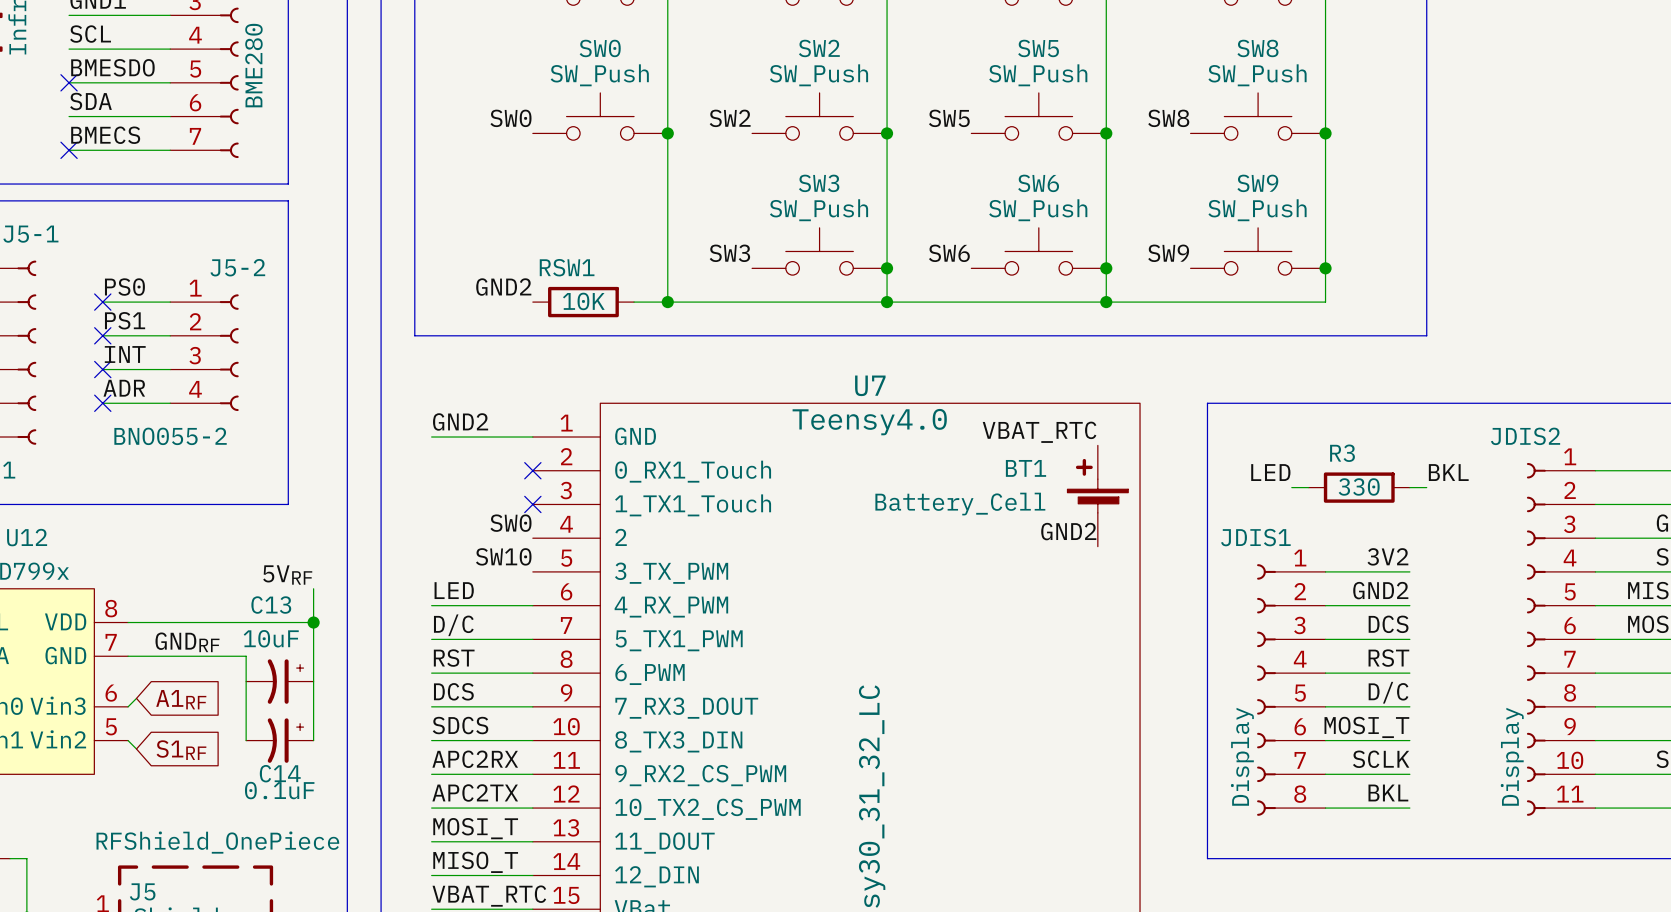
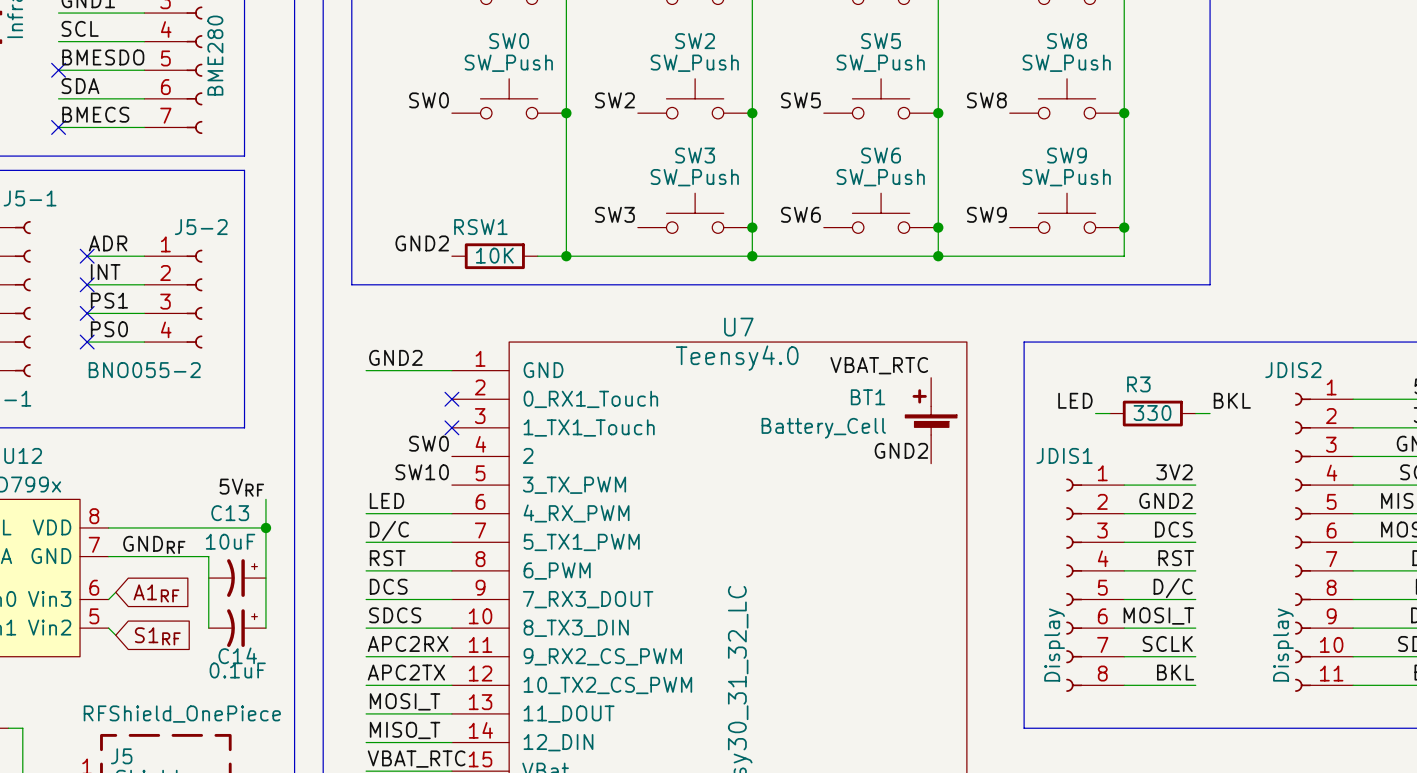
label: PS0 (124, 287) -> ADR (108, 243)
label: PS1 (125, 320) -> INT (105, 272)
label: INT (125, 354) -> PS1 (109, 300)
label: ADR (124, 388) -> PS0 (109, 329)

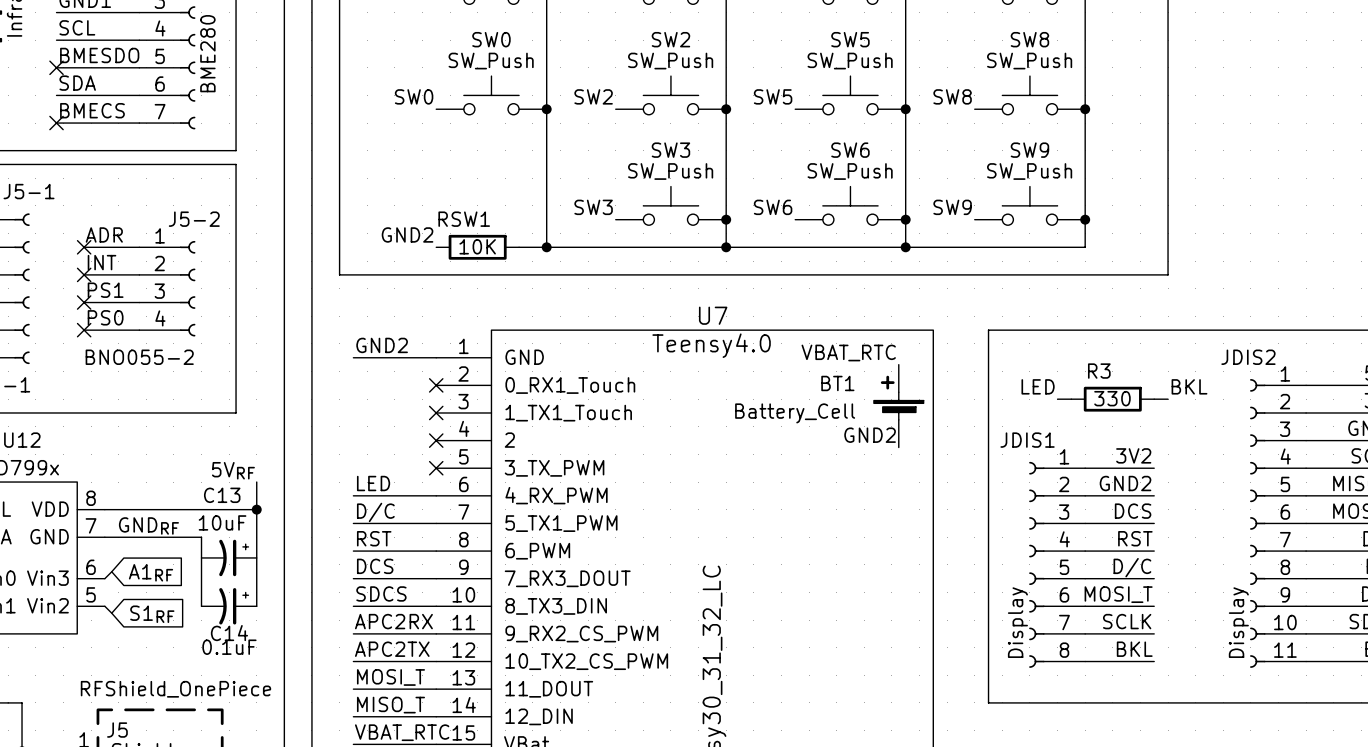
label: SW0 (429, 443) -> none
no-connect mark: none -> (436, 440)
label: SW10 (422, 472) -> none
no-connect mark: none -> (436, 468)

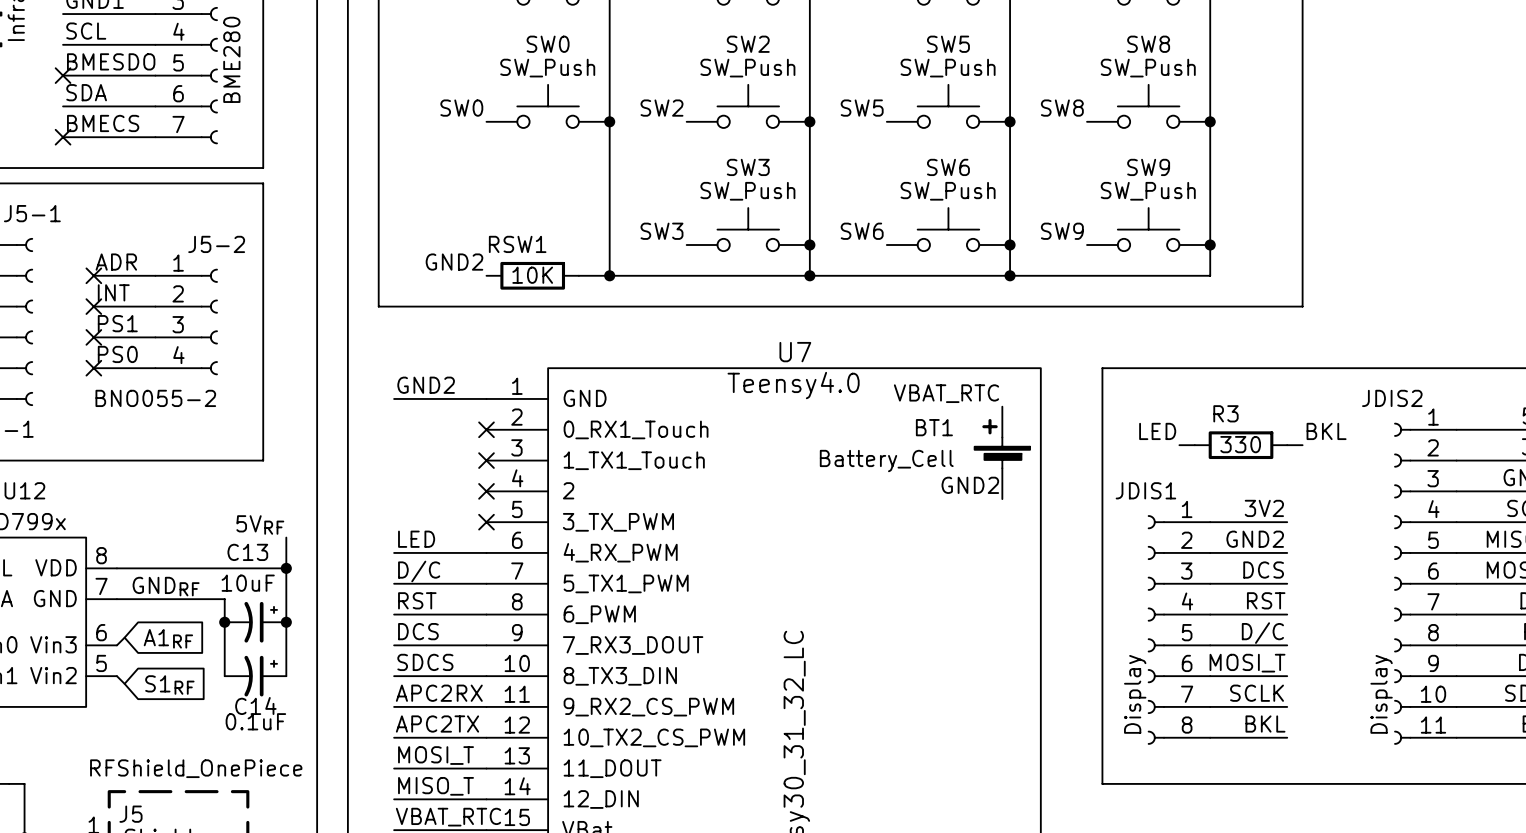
junction: none -> (224, 622)
junction: none -> (286, 622)

